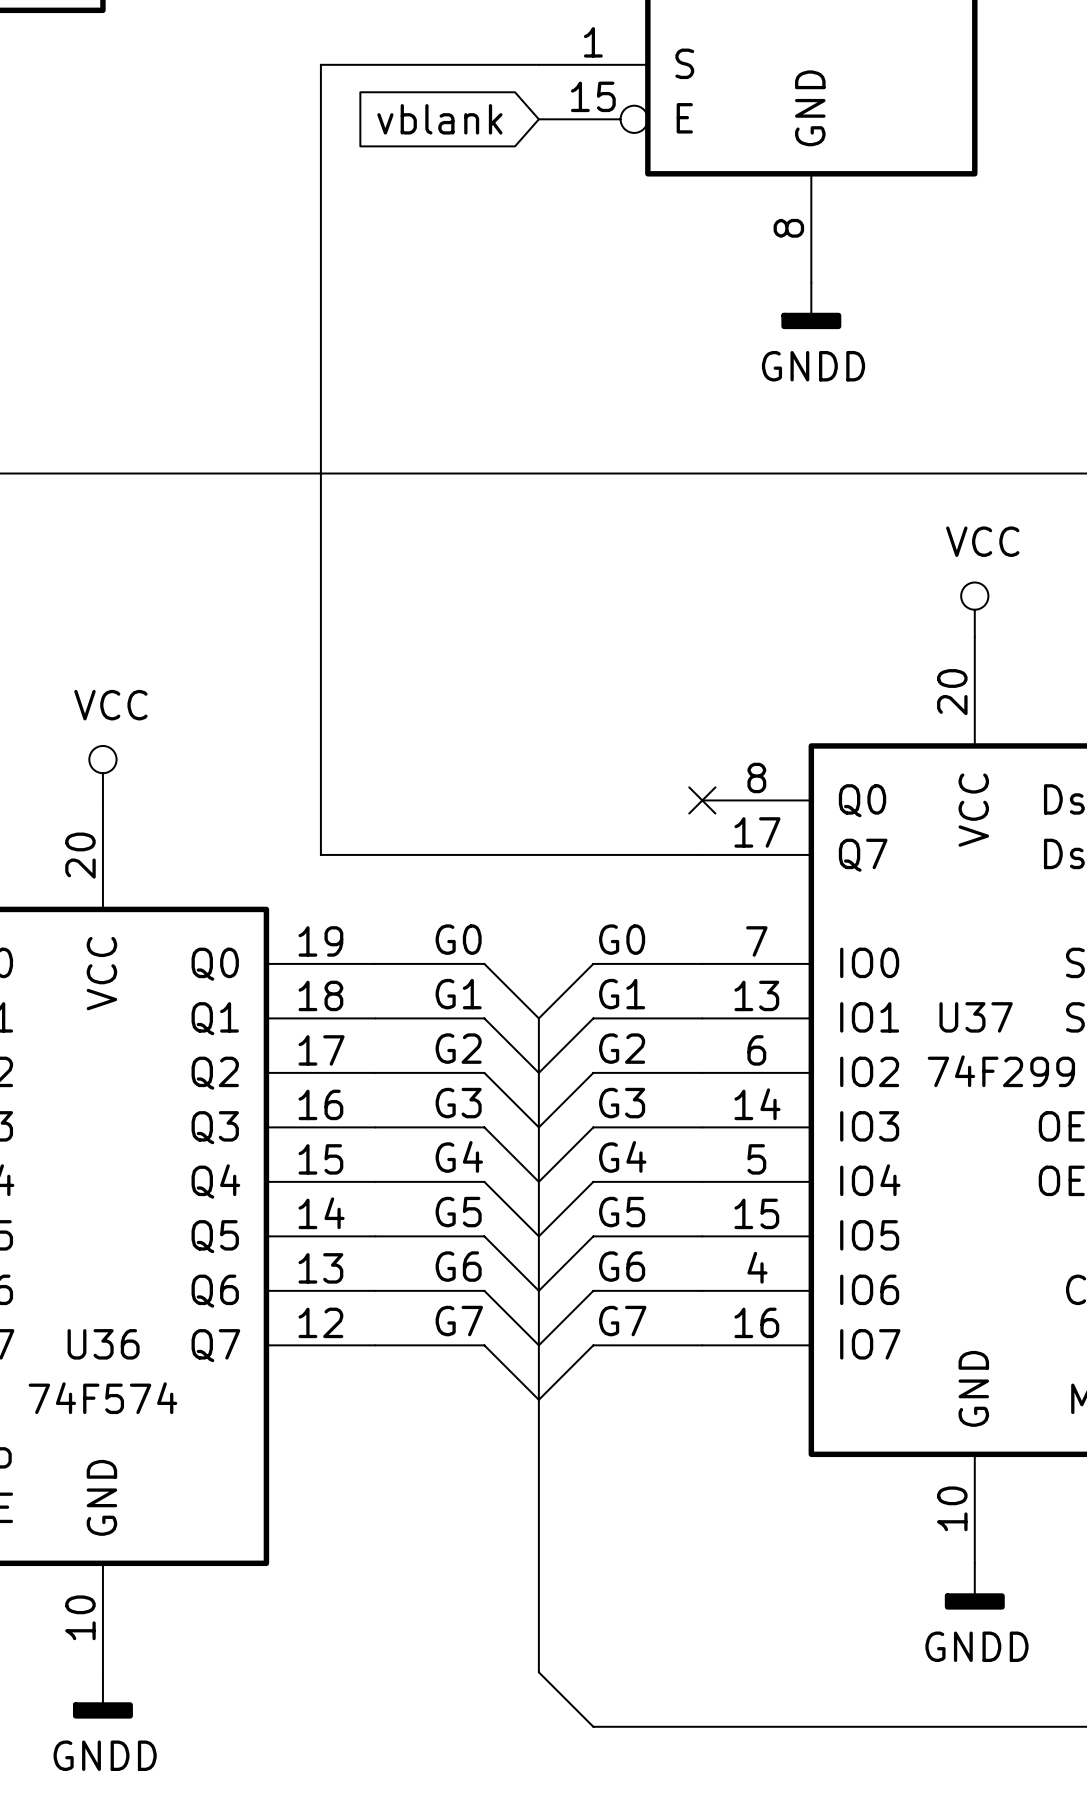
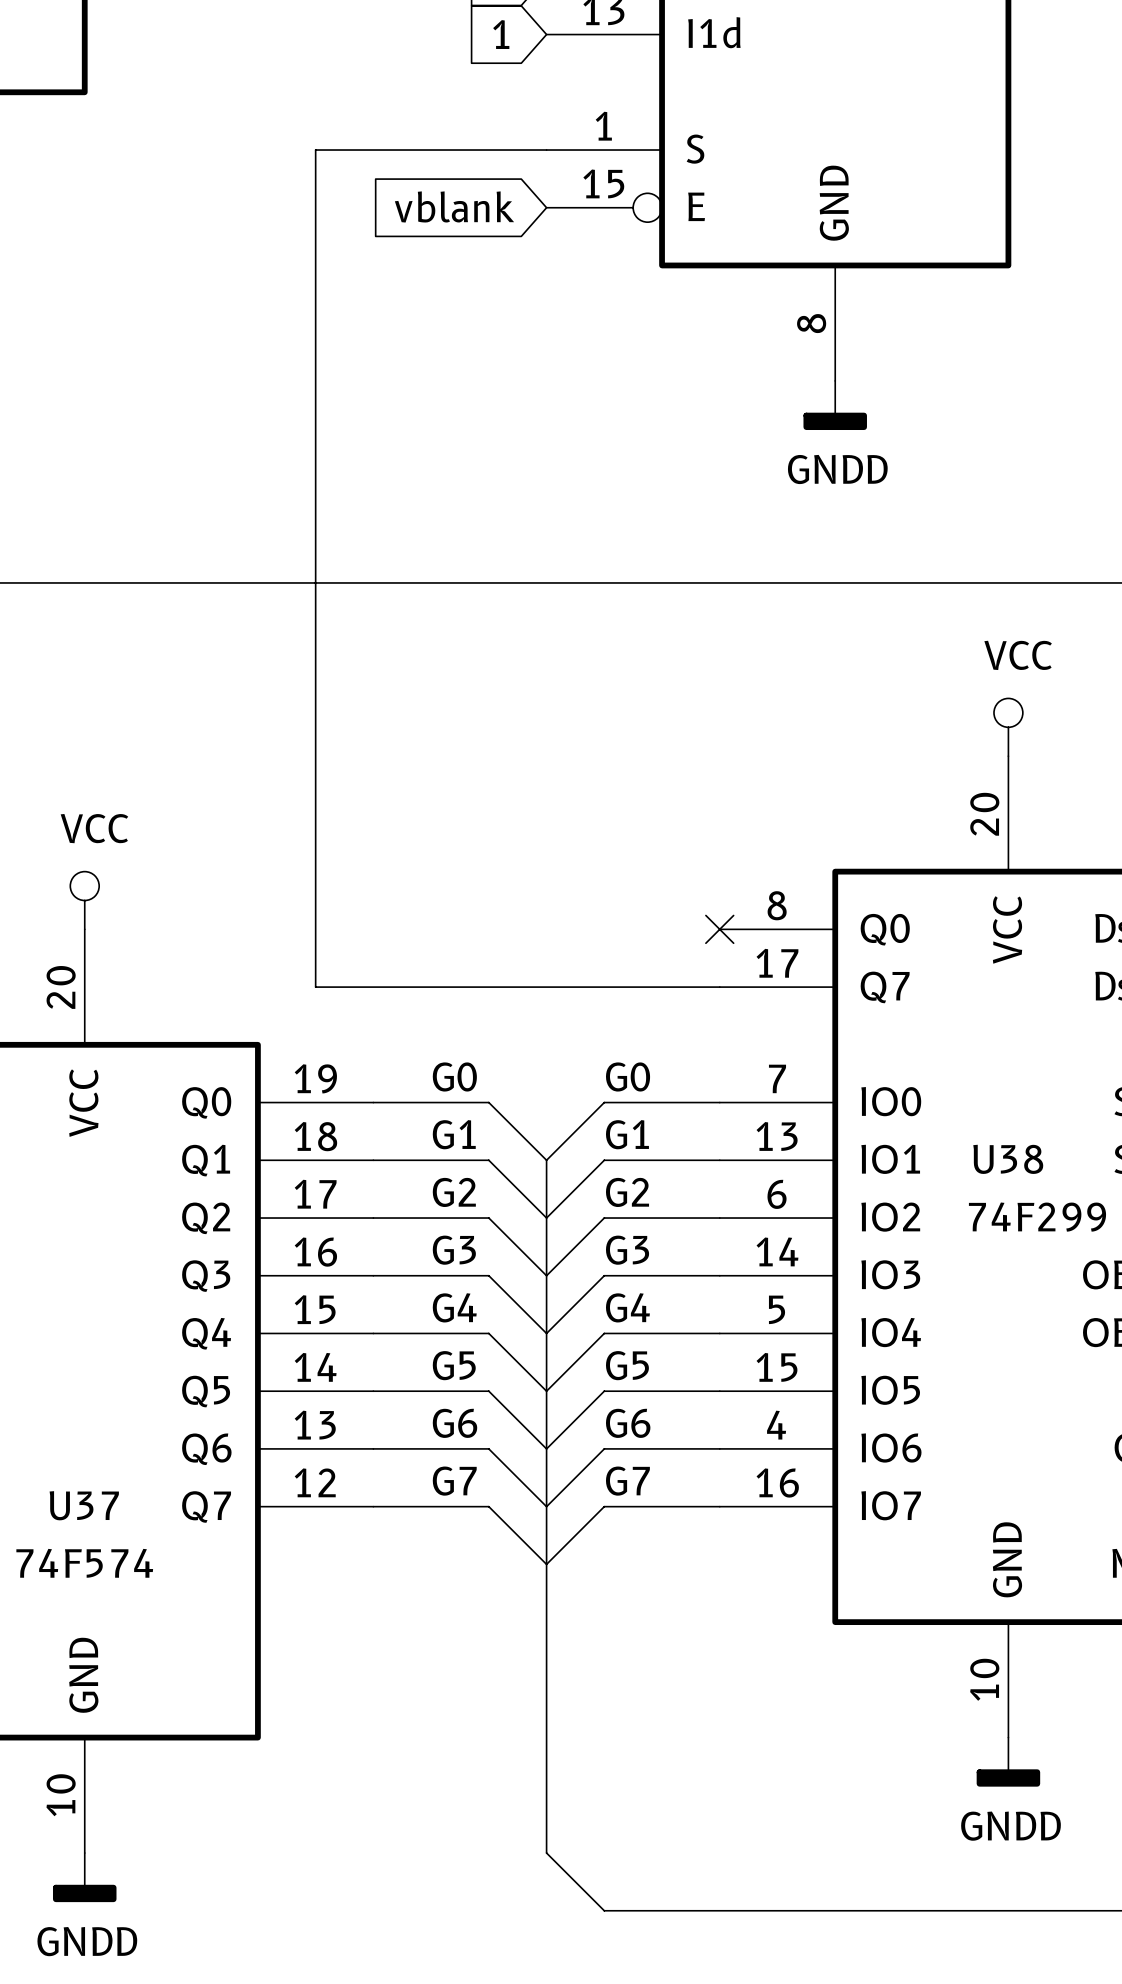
U37 name: U37 (976, 1017) -> U38 (1008, 1159)
U36 name: U36 (103, 1344) -> U37 (84, 1505)

